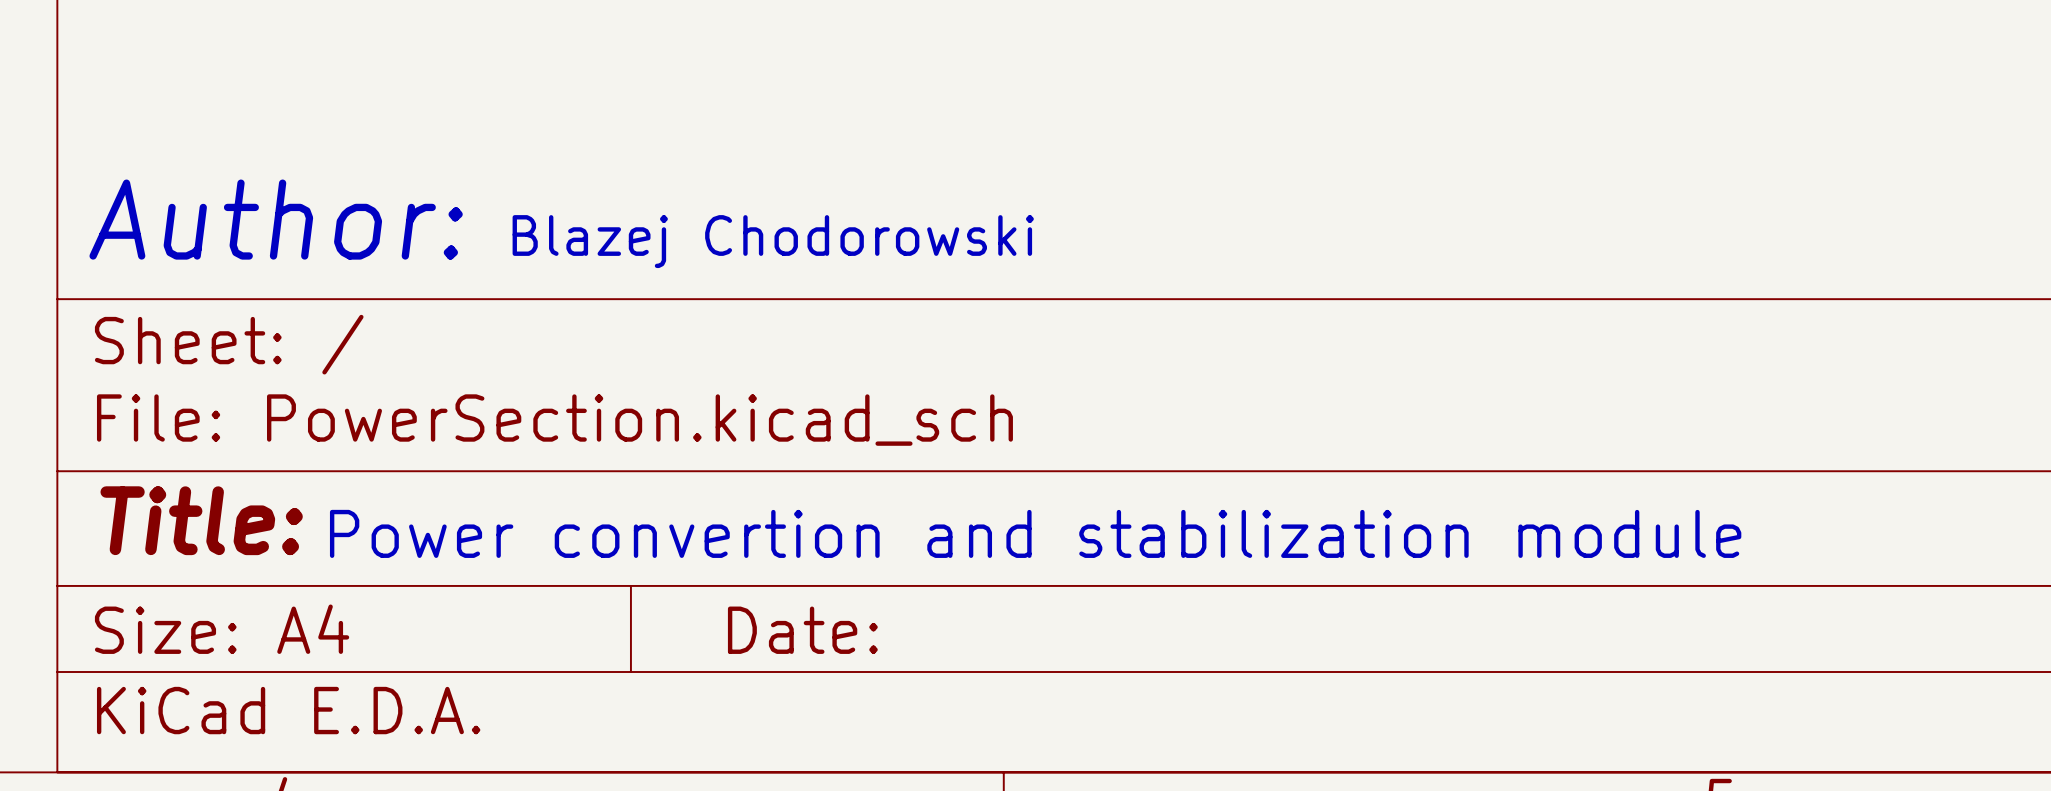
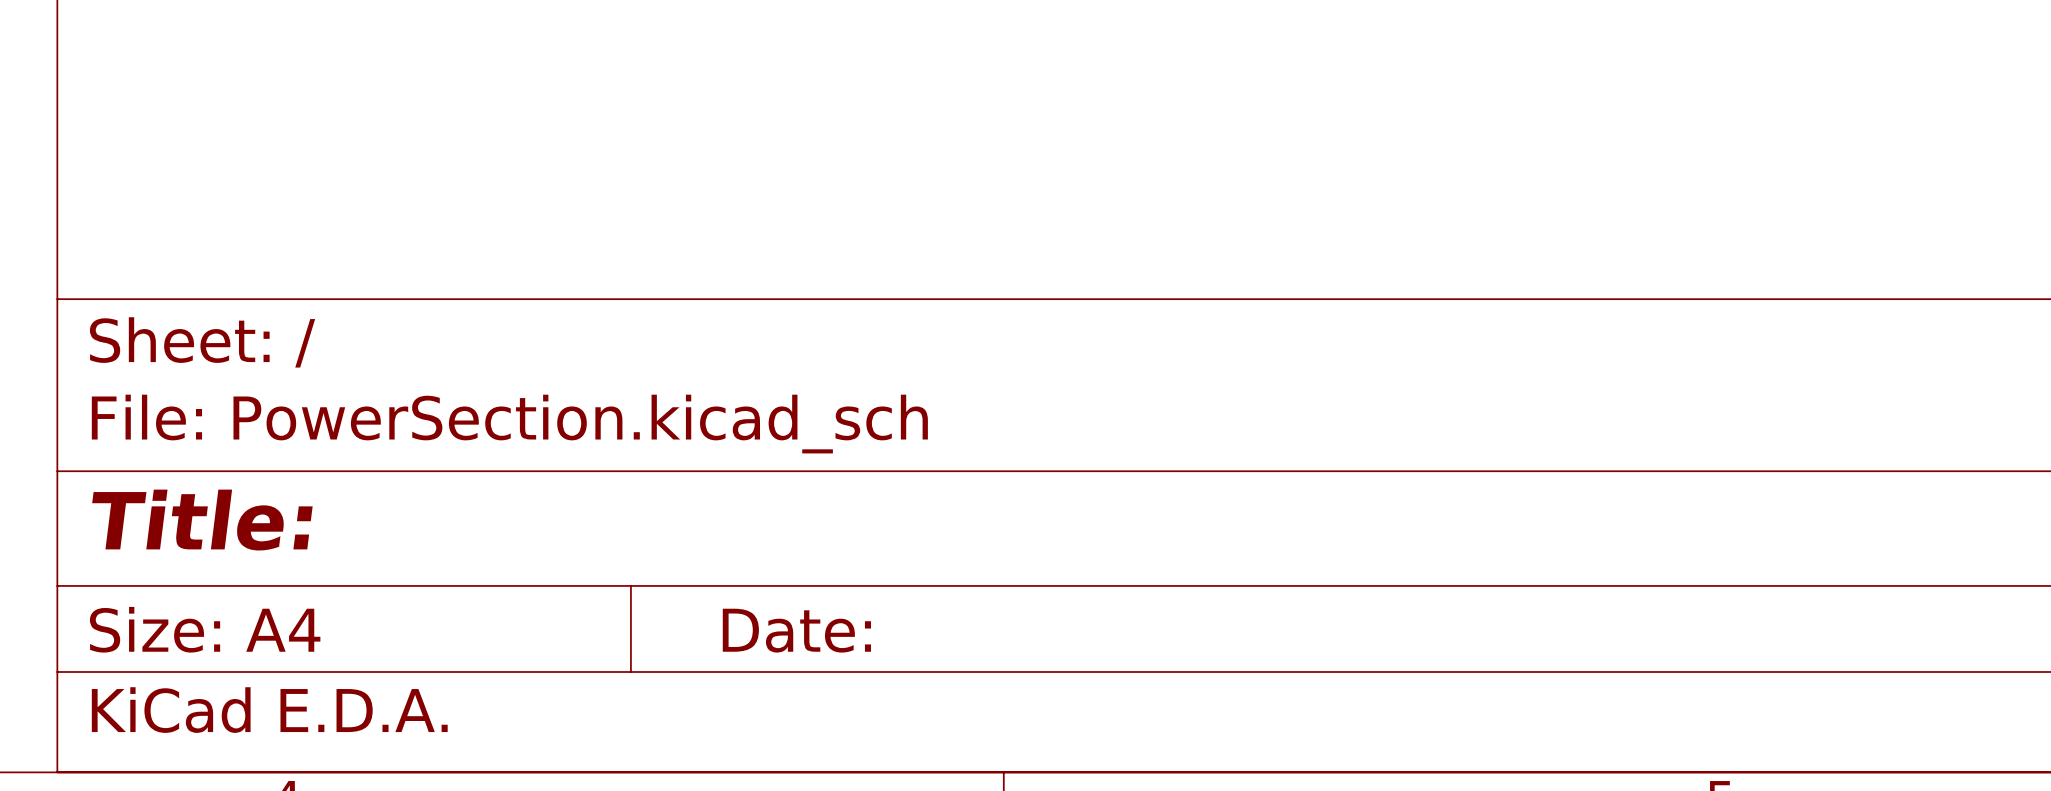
text: Author: (276, 219) -> none
text: Blazej Chodorowski (773, 241) -> none
text: Power convertion and stabilization module (1035, 533) -> none

